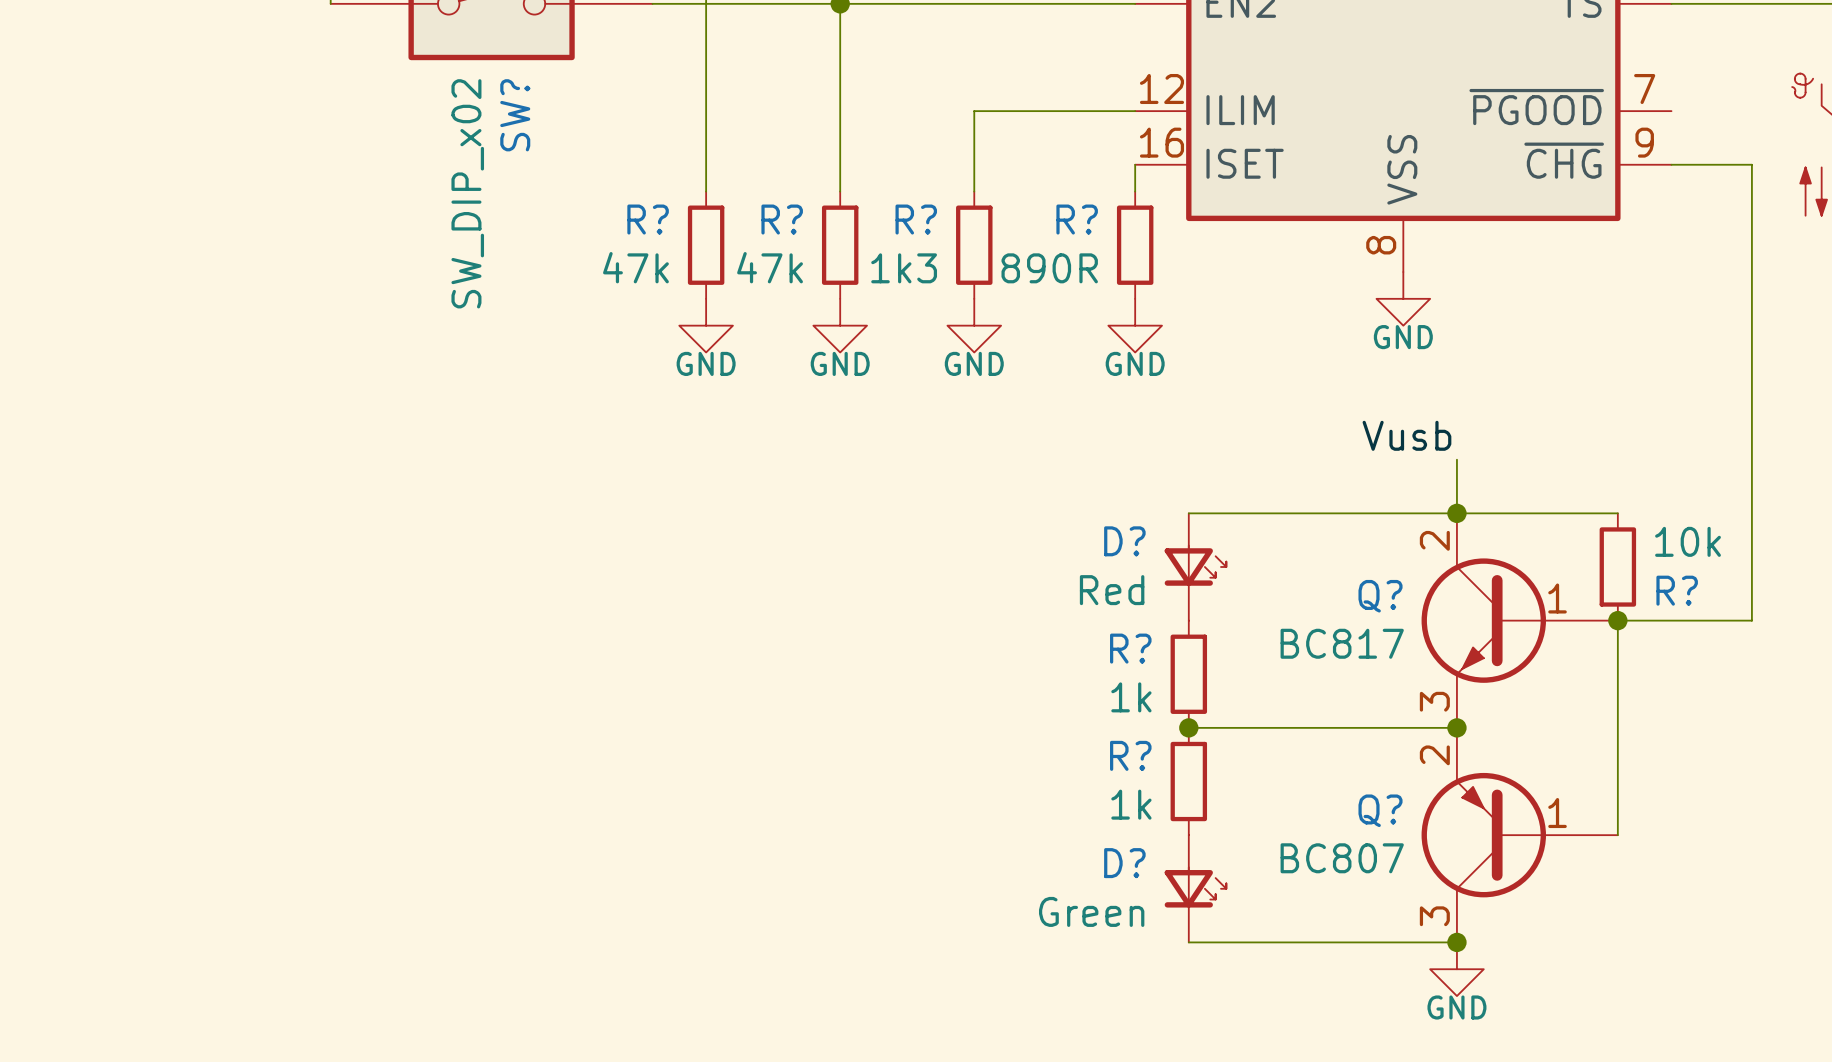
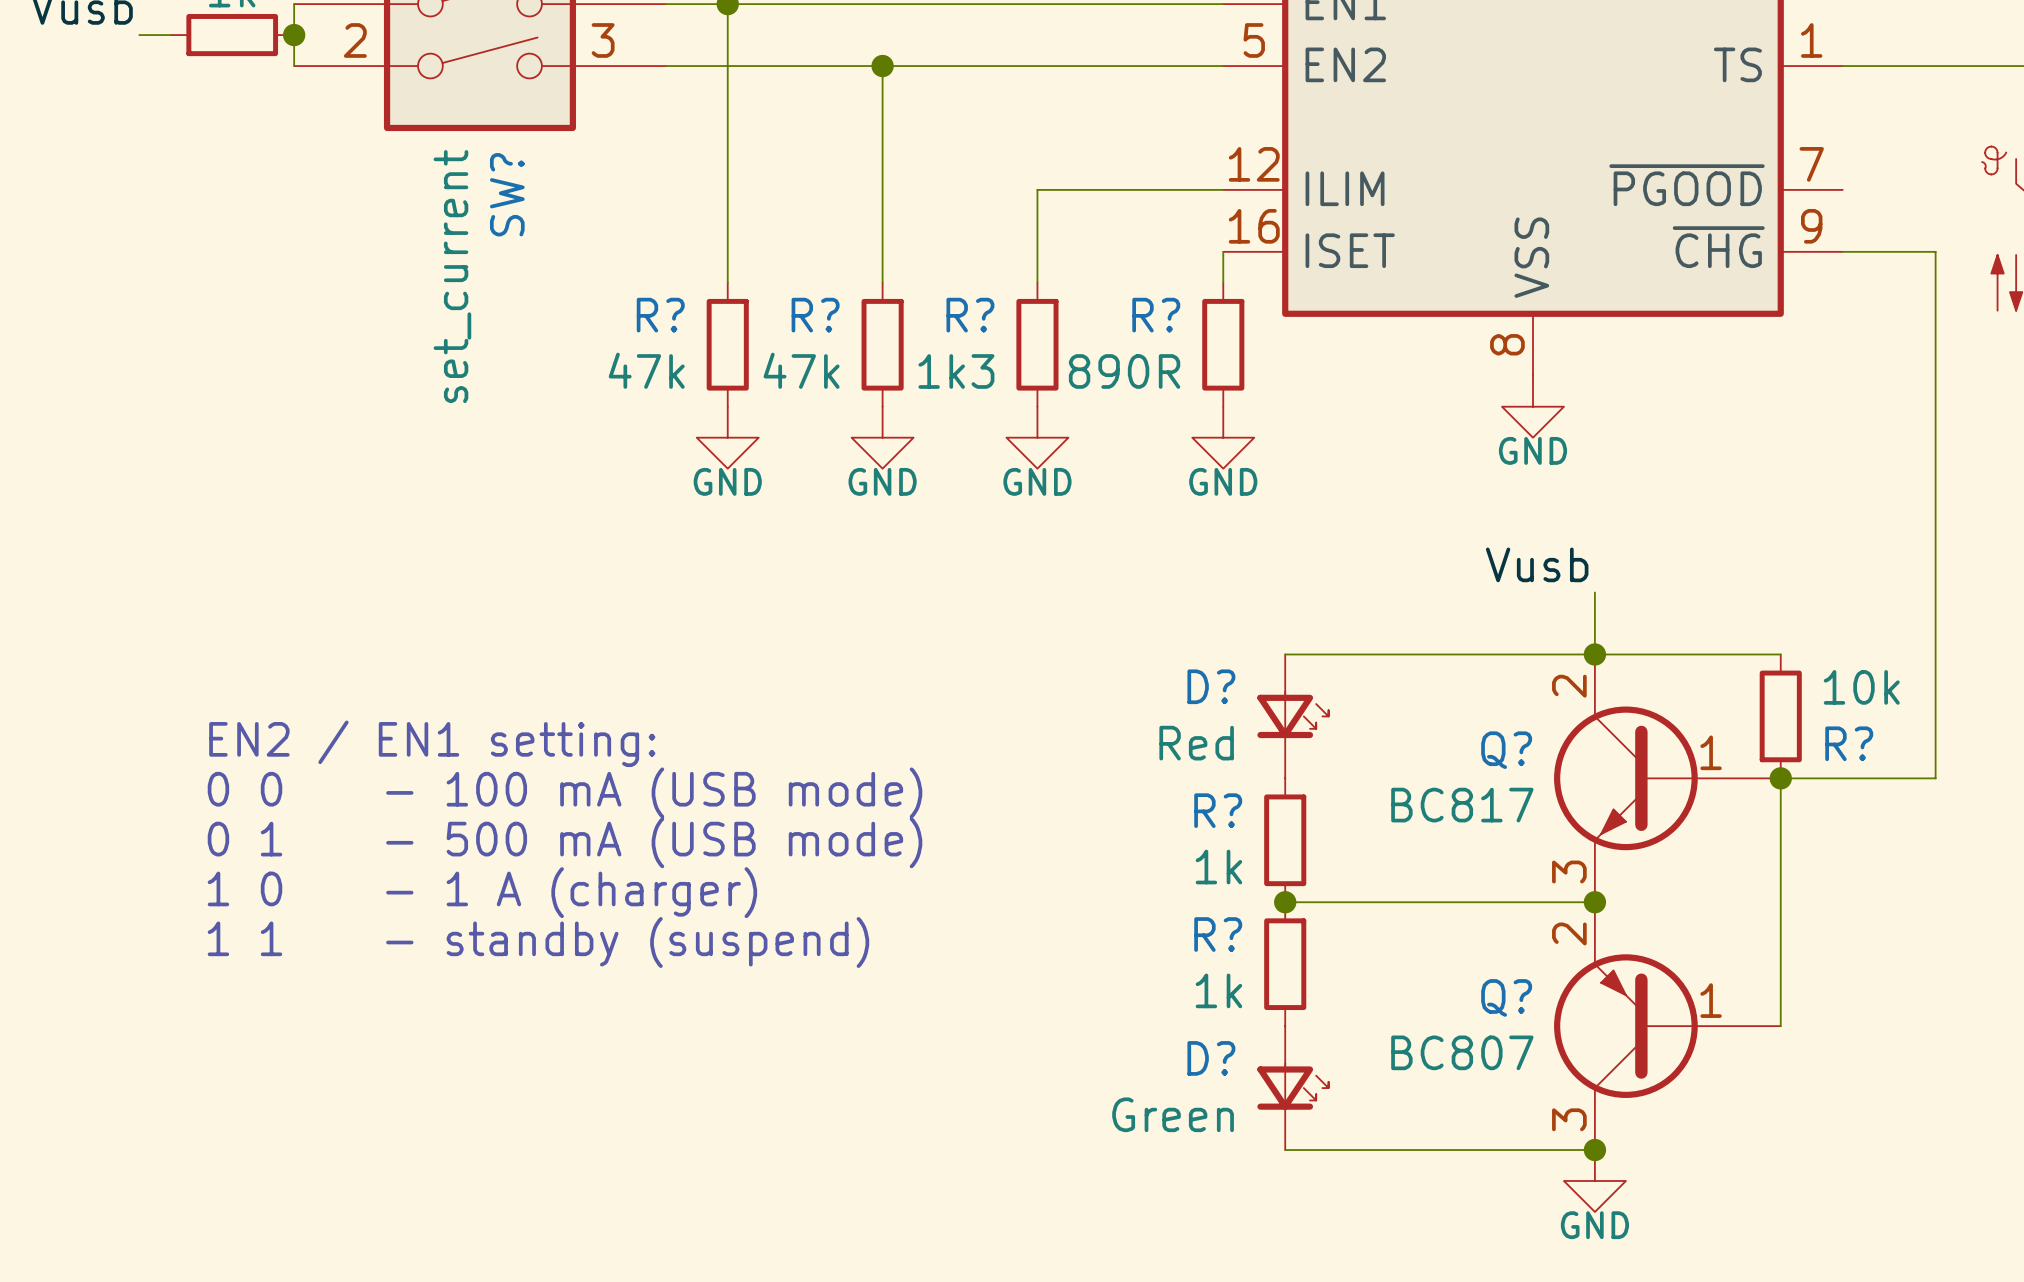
SW? value: SW_DIP_x02 (467, 193) -> set_current (452, 276)
text: none -> EN2 / EN1 setting: (432, 743)
text: none -> 0 0 - 100 mA (USB mode) (565, 792)
text: none -> 0 1 - 500 mA (USB mode) (565, 842)
text: none -> 1 0 - 1 A (charger) (482, 892)
text: none -> 1 1 - standby (suspend) (538, 942)

